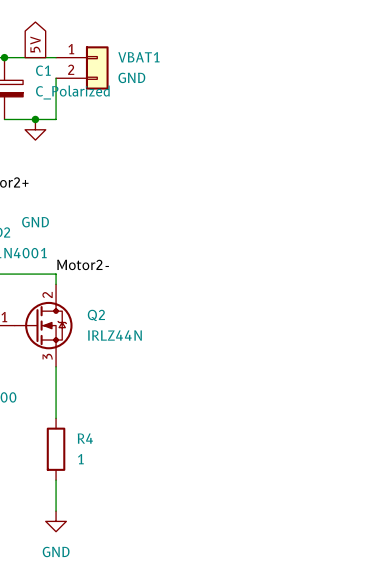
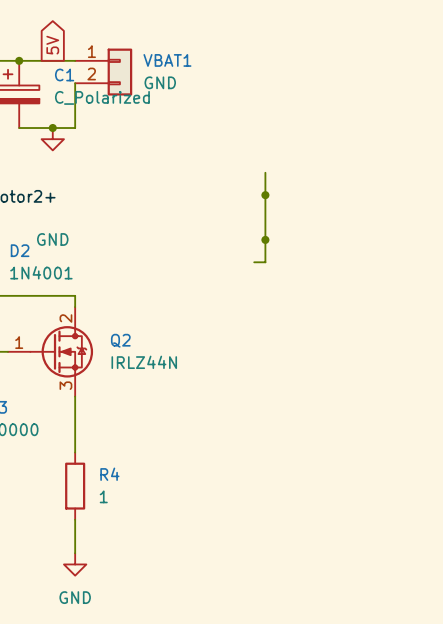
wire: none -> (265, 172) (265, 262) (254, 262)
junction: none -> (265, 195)
junction: none -> (265, 239)
label: Motor2- (83, 264) -> none

